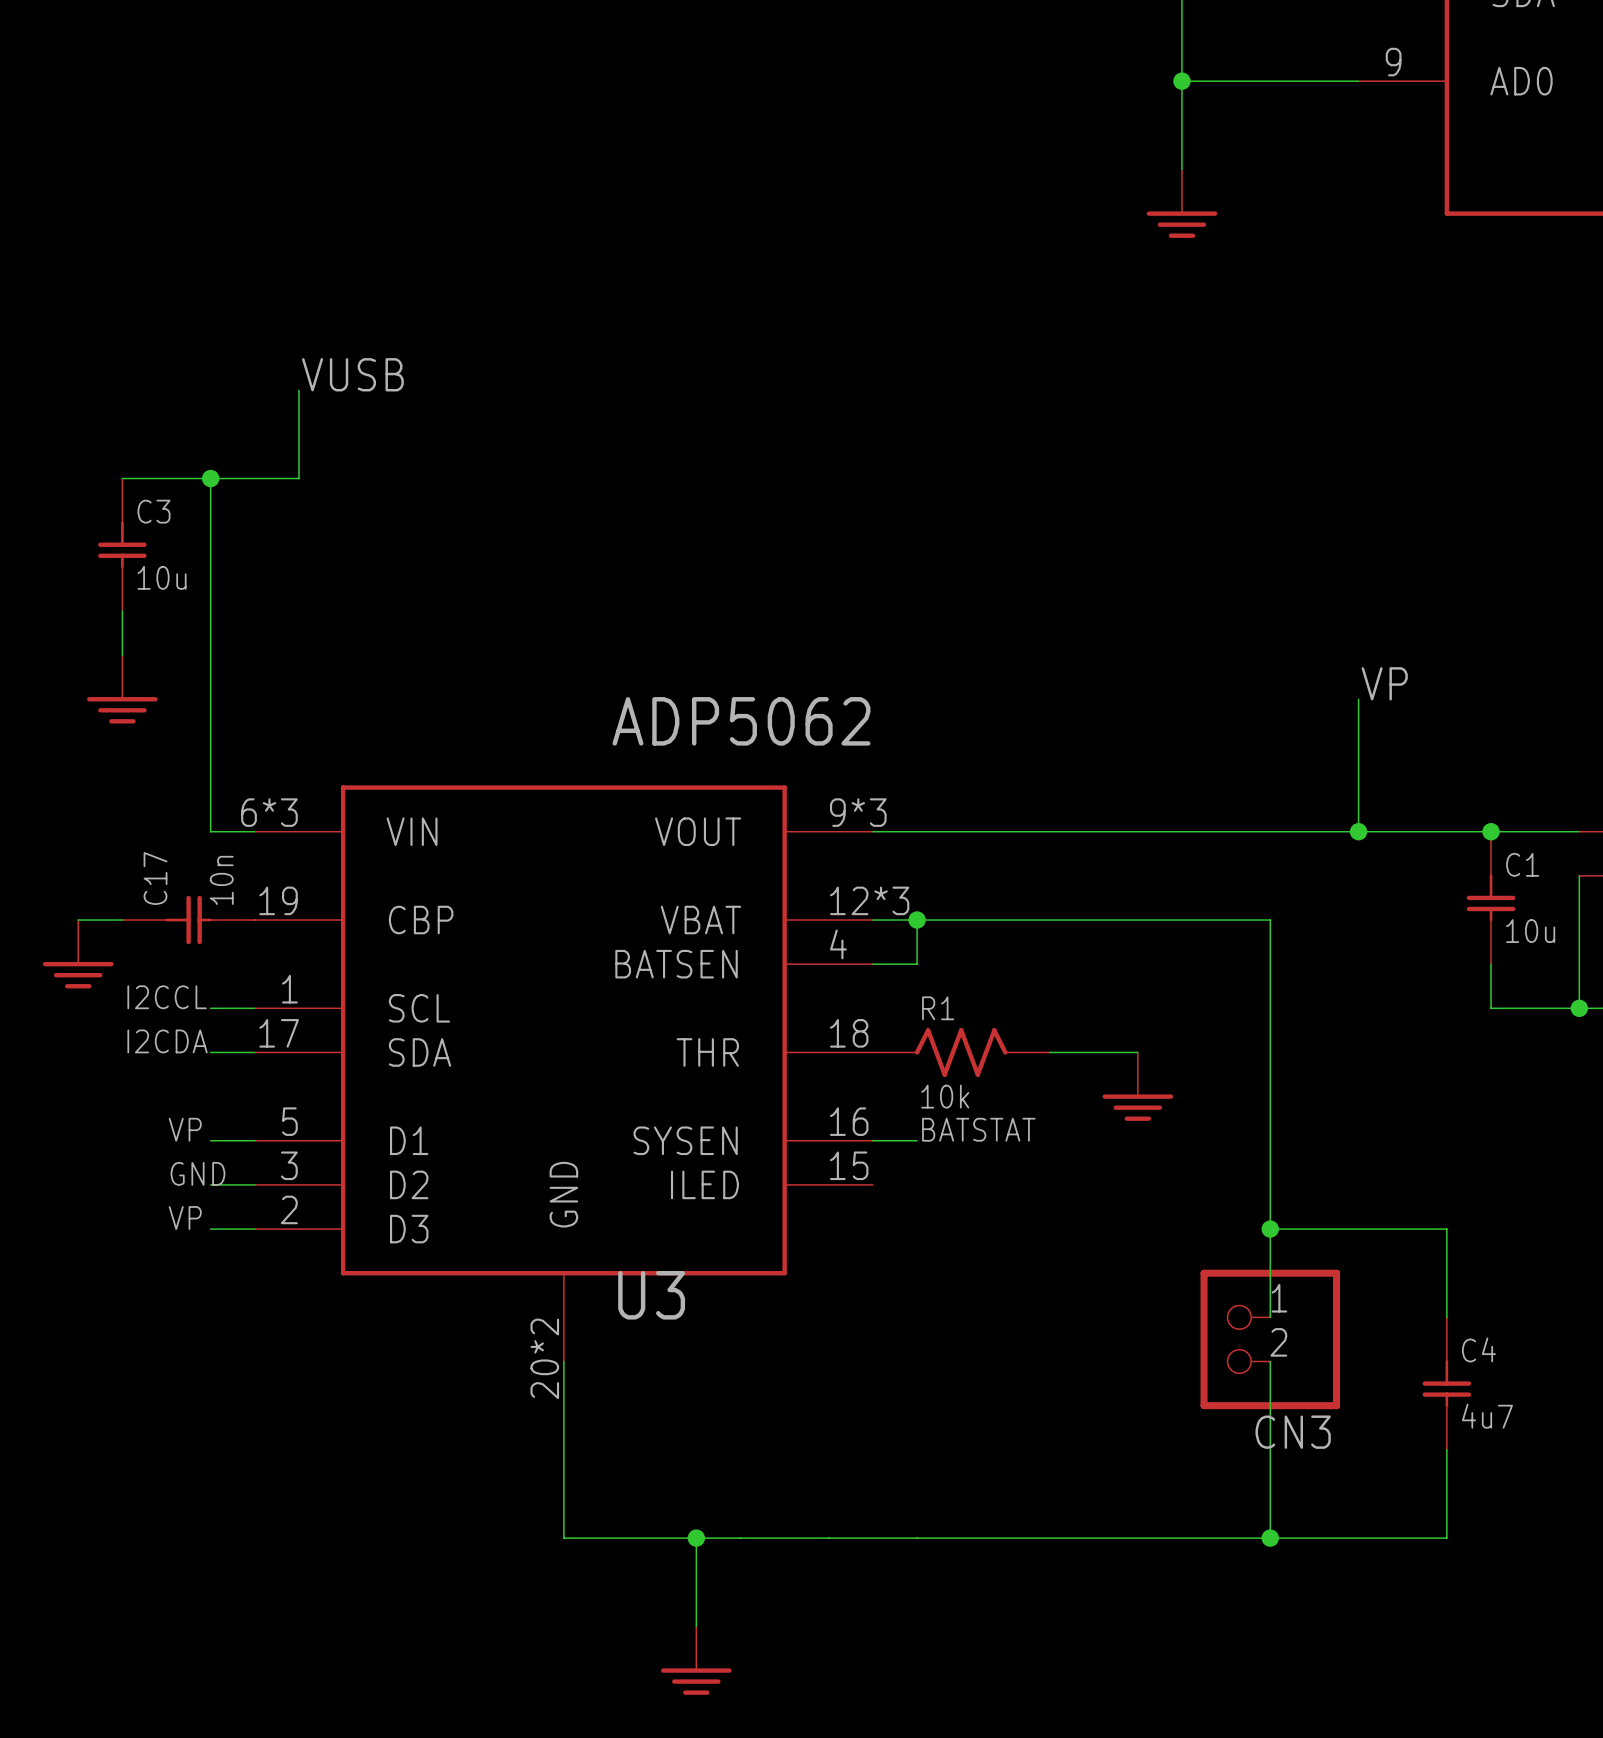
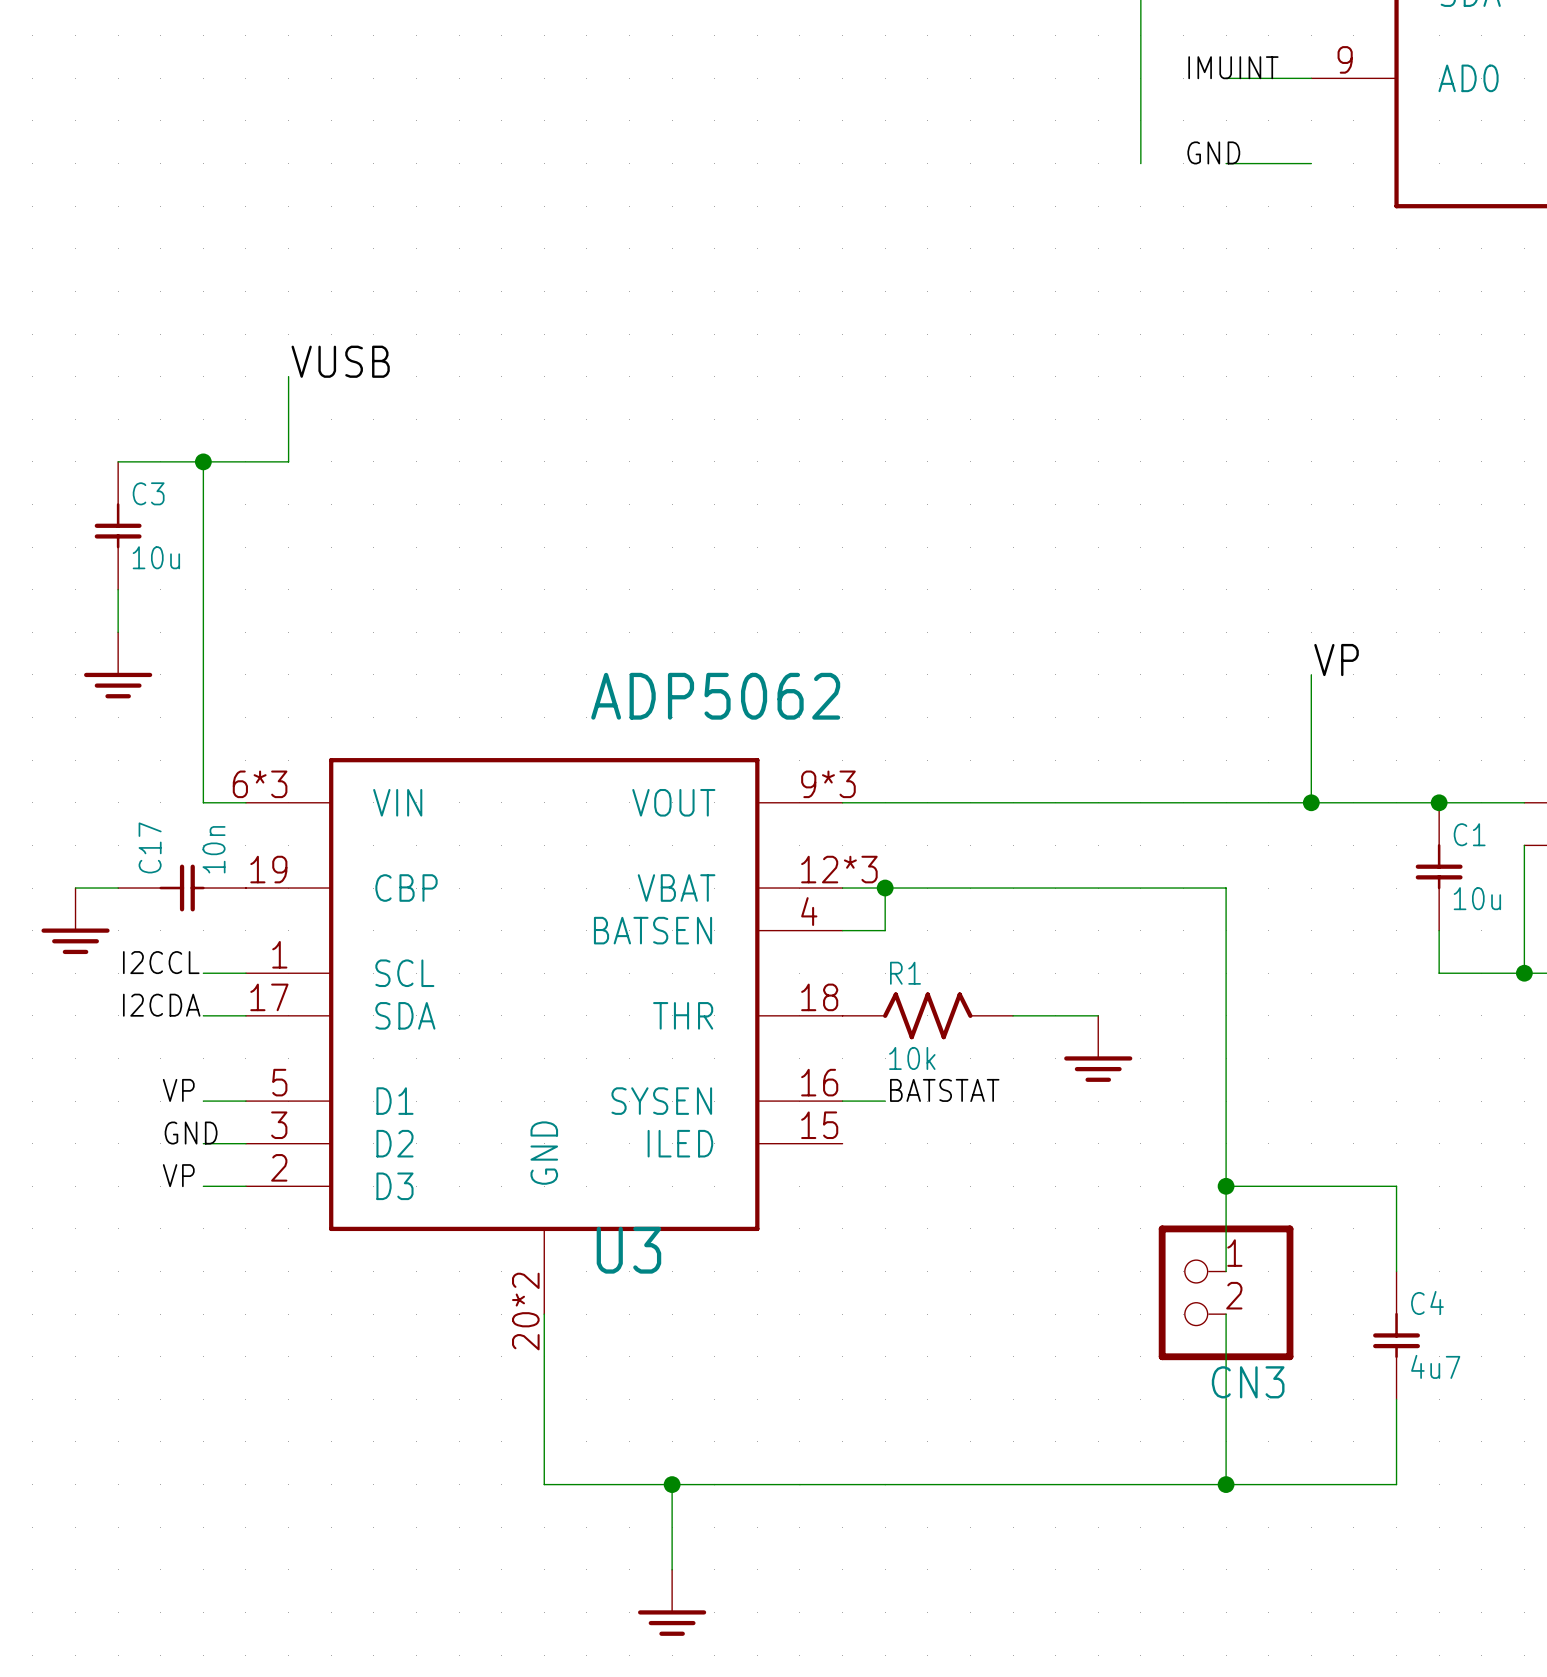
label: none -> IMUINT (1233, 67)
wire: (1181, 81) (1270, 81) -> (1226, 163) (1311, 163)
junction: (1181, 81) -> none
label: none -> GND (1213, 152)
power symbol: (1181, 203) -> none

